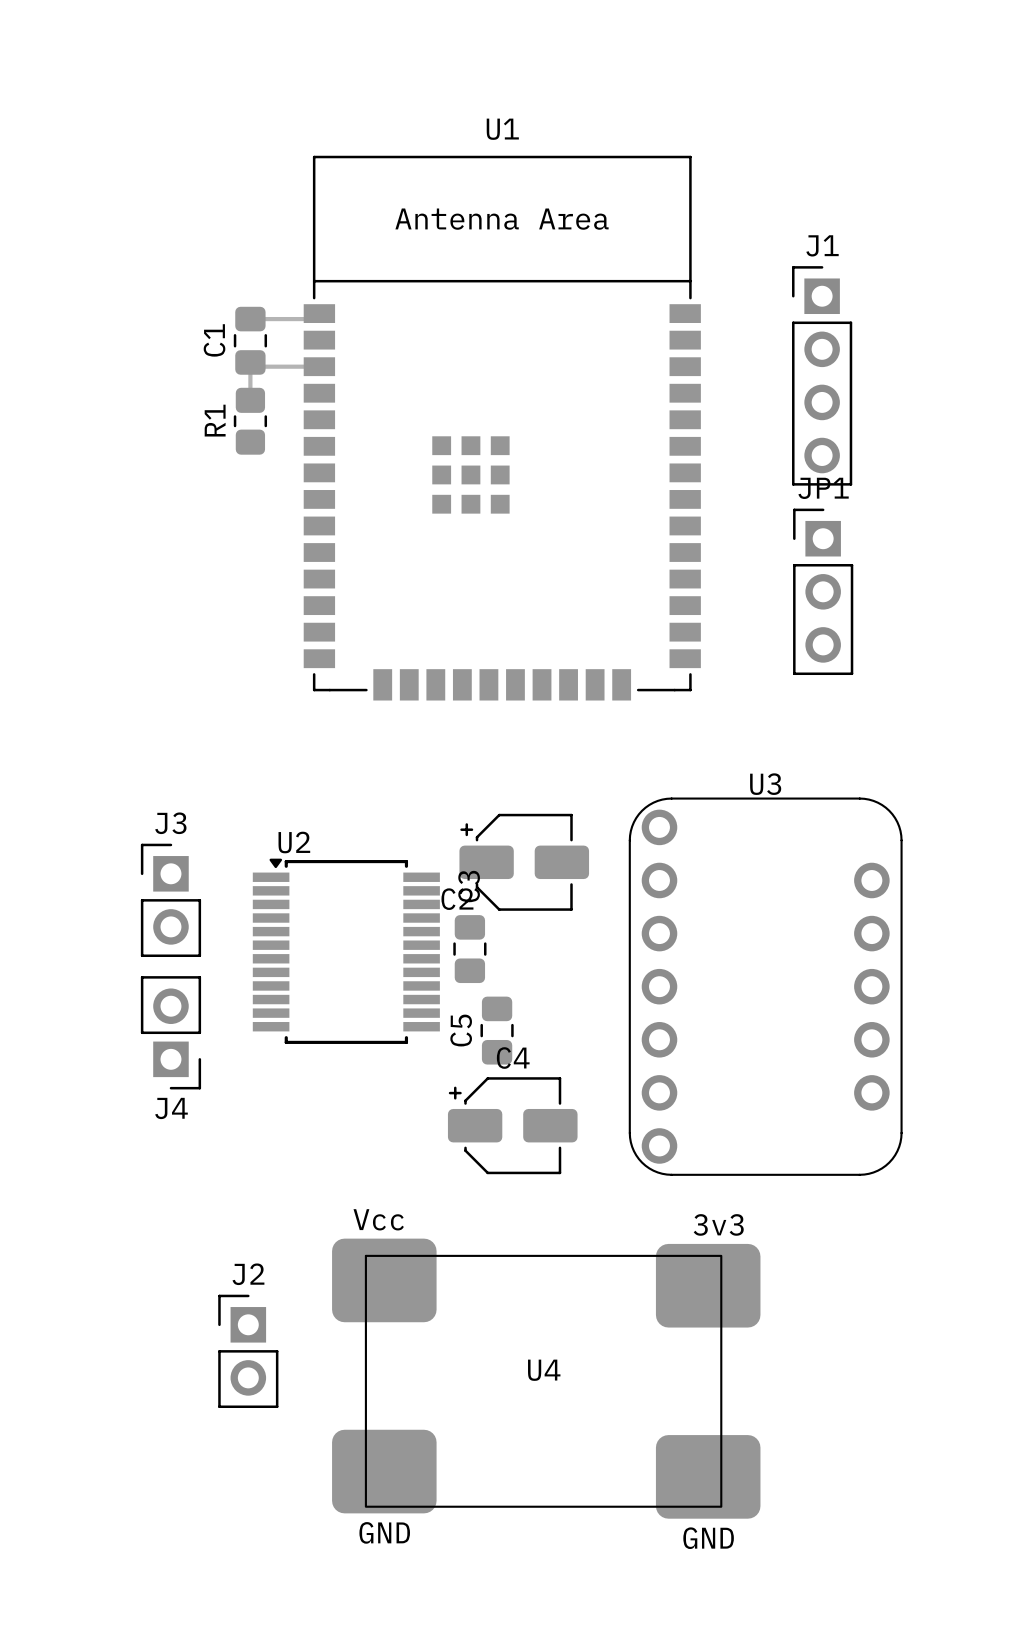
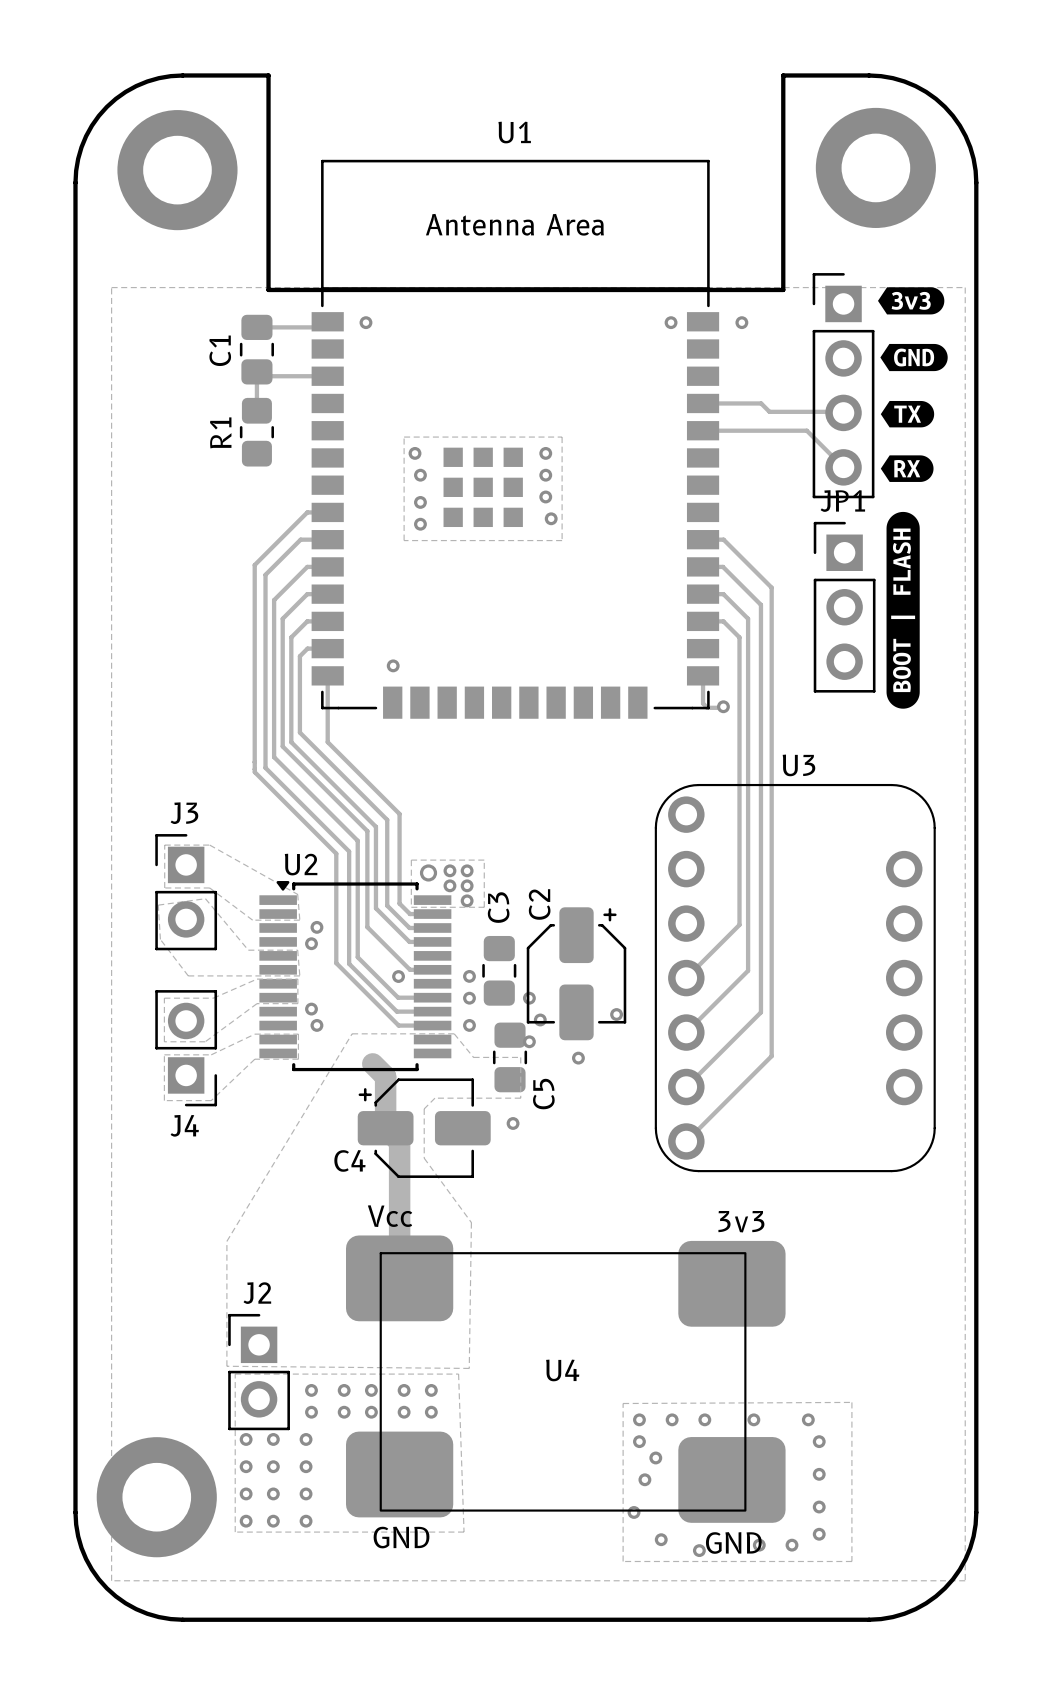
board edge: none -> (182, 75) (268, 75) (268, 289) (783, 289) (783, 75) (869, 75) (904, 81) (935, 98) (952, 115) (965, 136) (973, 158) (976, 182) (976, 1512) (970, 1547) (959, 1569) (935, 1596) (915, 1609) (892, 1617) (869, 1619) (170, 1619) (136, 1609) (115, 1596) (98, 1579) (86, 1559) (78, 1536) (75, 1512) (76, 170) (81, 147) (91, 125) (115, 98) (147, 81) (182, 75)
part: none -> (875, 167)
part: none -> (177, 170)
J1 name: J1 (822, 245) -> none
zone outline: none -> (111, 287) (965, 287) (965, 1580) (111, 1580) (111, 287)
drawing: none -> [877, 287, 945, 315]
via: none -> (365, 322)
via: none -> (671, 322)
via: none -> (741, 322)
drawing: none -> [880, 343, 948, 372]
drawing: none -> [880, 400, 935, 428]
track: none -> (703, 403) (761, 403) (769, 411) (843, 412)
track: none -> (703, 430) (806, 430) (843, 467)
zone outline: none -> (404, 437) (562, 437) (562, 540) (404, 540) (404, 437)
via: none -> (415, 453)
via: none -> (545, 453)
drawing: none -> [880, 455, 934, 482]
via: none -> (420, 475)
via: none -> (545, 475)
via: none -> (545, 496)
via: none -> (420, 502)
drawing: none -> [886, 511, 920, 709]
track: none -> (327, 512) (307, 512) (254, 565) (254, 772) (336, 853) (336, 963) (398, 1025) (432, 1025)
via: none -> (551, 518)
via: none -> (420, 524)
track: none -> (327, 539) (300, 539) (265, 574) (265, 767) (349, 851) (349, 963) (396, 1011) (432, 1011)
track: none -> (703, 539) (723, 539) (771, 587) (771, 1056) (686, 1141)
track: none -> (327, 566) (307, 566) (274, 600) (274, 757) (357, 840) (357, 957) (398, 997) (432, 997)
track: none -> (703, 566) (723, 566) (760, 604) (760, 1012) (686, 1087)
track: none -> (327, 594) (307, 594) (282, 618) (282, 746) (367, 831) (367, 927) (410, 969) (432, 969)
track: none -> (703, 594) (723, 594) (748, 618) (748, 970) (686, 1032)
track: none -> (327, 621) (307, 621) (291, 637) (291, 742) (375, 826) (375, 908) (409, 941) (432, 941)
track: none -> (703, 621) (723, 621) (739, 637) (739, 924) (686, 978)
track: none -> (327, 648) (307, 648) (299, 656) (299, 732) (387, 819) (387, 905) (409, 927) (432, 927)
via: none -> (393, 665)
track: none -> (327, 675) (327, 742) (399, 813) (399, 903) (410, 914) (432, 914)
track: none -> (703, 675) (703, 703) (707, 707) (723, 706)
via: none -> (723, 706)
U3 name position: U3 (765, 784) -> U3 (798, 765)
zone outline: none -> (164, 845) (209, 845) (297, 894) (299, 920) (252, 920) (209, 887) (164, 887) (164, 845)
zone outline: none -> (411, 860) (484, 860) (484, 907) (411, 907) (411, 860)
via: none -> (449, 870)
via: none -> (467, 870)
via: none -> (428, 872)
C2 rotation: 0° (524, 862) -> 90° clockwise (576, 973)
C2 position: (524, 862) -> (576, 973)
via: none -> (449, 885)
via: none -> (467, 885)
zone outline: none -> (205, 898) (158, 905) (160, 939) (188, 975) (299, 975) (297, 950) (248, 950) (205, 898)
via: none -> (467, 900)
J3 position: (170, 900) -> (186, 892)
via: none -> (316, 927)
via: none -> (311, 943)
C3 position: (469, 949) -> (499, 970)
via: none -> (398, 976)
via: none -> (469, 976)
zone outline: none -> (257, 979) (213, 998) (164, 998) (164, 1041) (205, 1041) (257, 1003) (297, 1003) (297, 979) (257, 979)
via: none -> (469, 998)
via: none -> (529, 998)
via: none -> (311, 1009)
U3 position: (765, 986) -> (795, 978)
via: none -> (616, 1014)
via: none -> (540, 1019)
via: none -> (316, 1025)
via: none -> (469, 1025)
zone outline: none -> (254, 1034) (211, 1054) (164, 1054) (164, 1100) (211, 1100) (254, 1059) (298, 1059) (298, 1034) (254, 1034)
zone outline: none -> (352, 1033) (226, 1241) (226, 1366) (469, 1368) (471, 1222) (424, 1158) (424, 1108) (434, 1098) (520, 1098) (520, 1057) (473, 1057) (454, 1033) (352, 1033)
via: none -> (529, 1041)
C5 name position: C5 (461, 1030) -> C5 (543, 1094)
via: none -> (578, 1058)
J4 position: (170, 1032) -> (186, 1048)
track: none -> (372, 1063) (385, 1076) (385, 1128) (399, 1142) (399, 1278)
C4 name position: C4 (513, 1058) -> C4 (349, 1160)
via: none -> (513, 1123)
C4 position: (512, 1125) -> (424, 1128)
zone outline: none -> (235, 1374) (235, 1532) (464, 1532) (458, 1374) (235, 1374)
J2 position: (248, 1351) -> (259, 1372)
via: none -> (311, 1390)
via: none -> (344, 1390)
via: none -> (371, 1390)
via: none -> (404, 1390)
via: none -> (431, 1390)
zone outline: none -> (851, 1402) (851, 1561) (623, 1561) (623, 1403) (851, 1402)
via: none -> (311, 1412)
via: none -> (344, 1412)
via: none -> (371, 1412)
via: none -> (404, 1412)
via: none -> (431, 1412)
U4 position: (546, 1378) -> (565, 1379)
via: none -> (639, 1419)
via: none -> (672, 1419)
via: none -> (704, 1419)
via: none -> (753, 1419)
via: none -> (808, 1419)
via: none -> (246, 1439)
via: none -> (273, 1439)
via: none -> (306, 1439)
via: none -> (639, 1441)
via: none -> (819, 1441)
via: none -> (655, 1457)
via: none -> (246, 1466)
via: none -> (273, 1466)
via: none -> (306, 1466)
via: none -> (819, 1474)
via: none -> (644, 1479)
via: none -> (246, 1493)
via: none -> (273, 1493)
via: none -> (306, 1493)
part: none -> (156, 1497)
via: none -> (819, 1507)
via: none -> (634, 1512)
via: none -> (246, 1521)
via: none -> (273, 1521)
via: none -> (306, 1521)
via: none -> (819, 1534)
via: none -> (661, 1539)
via: none -> (759, 1545)
via: none -> (791, 1545)
via: none -> (699, 1550)

